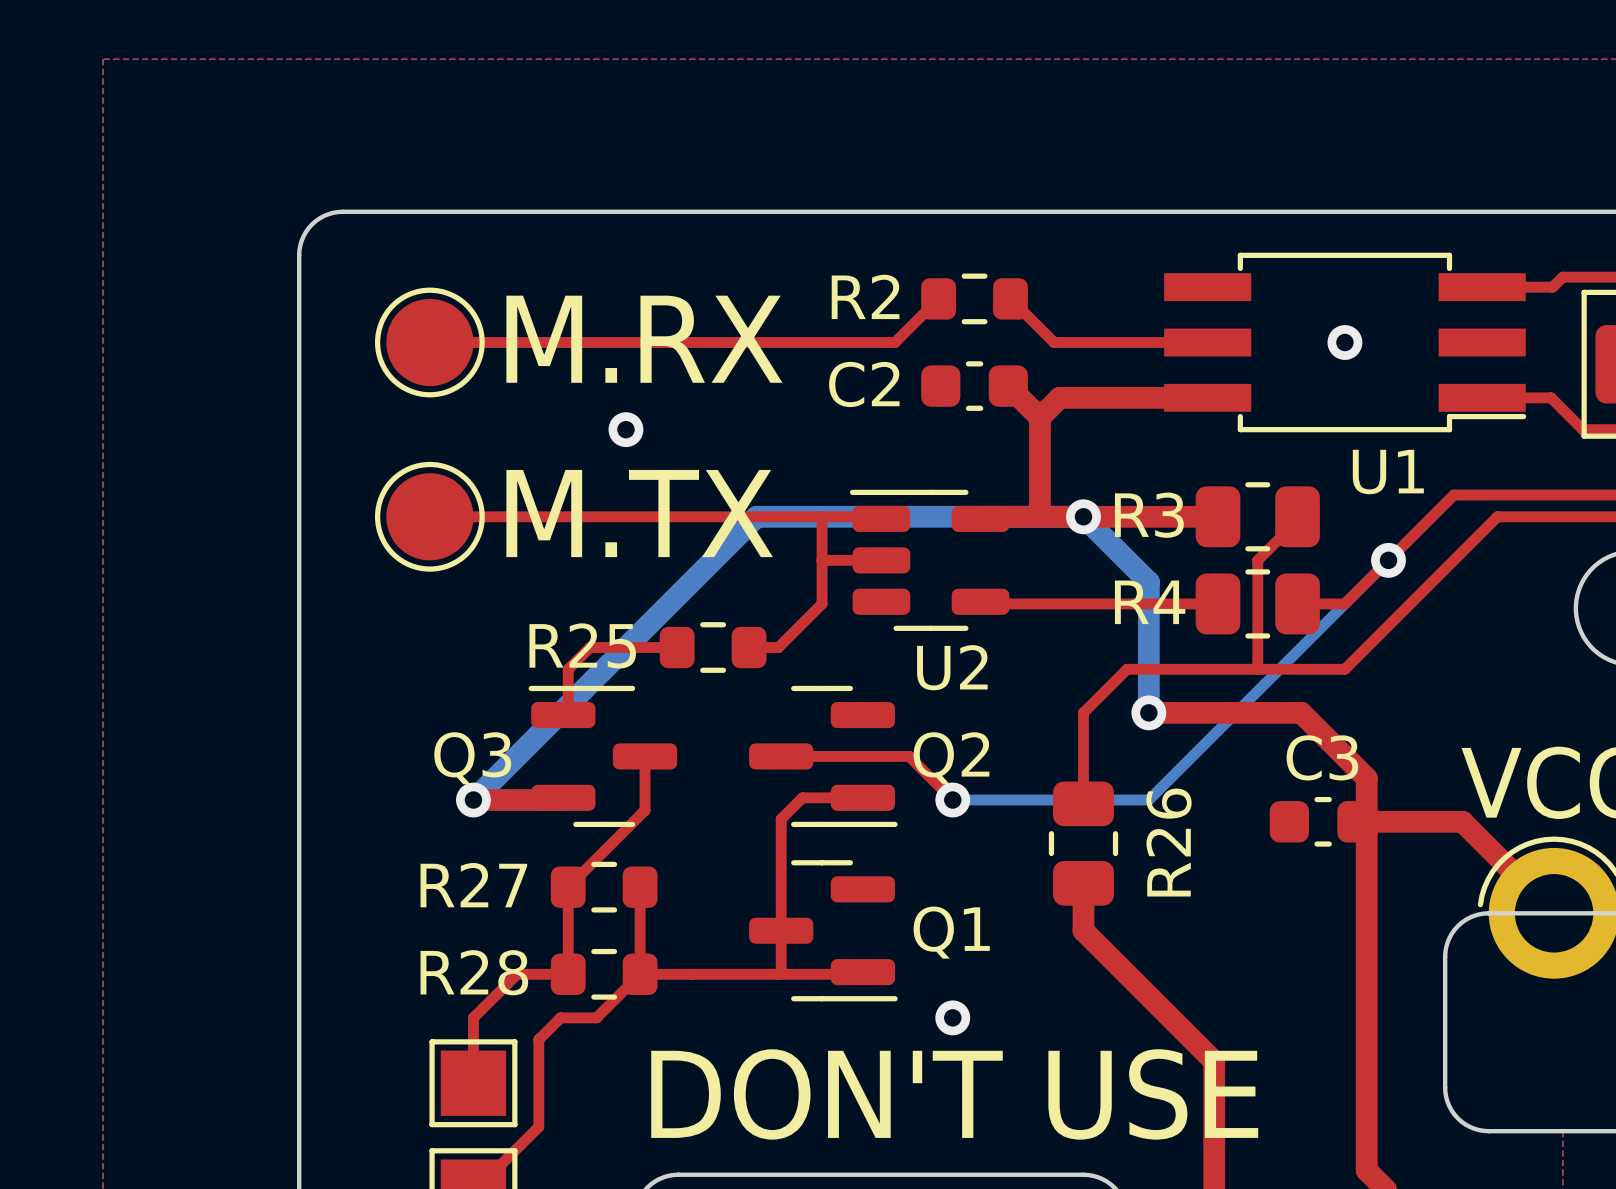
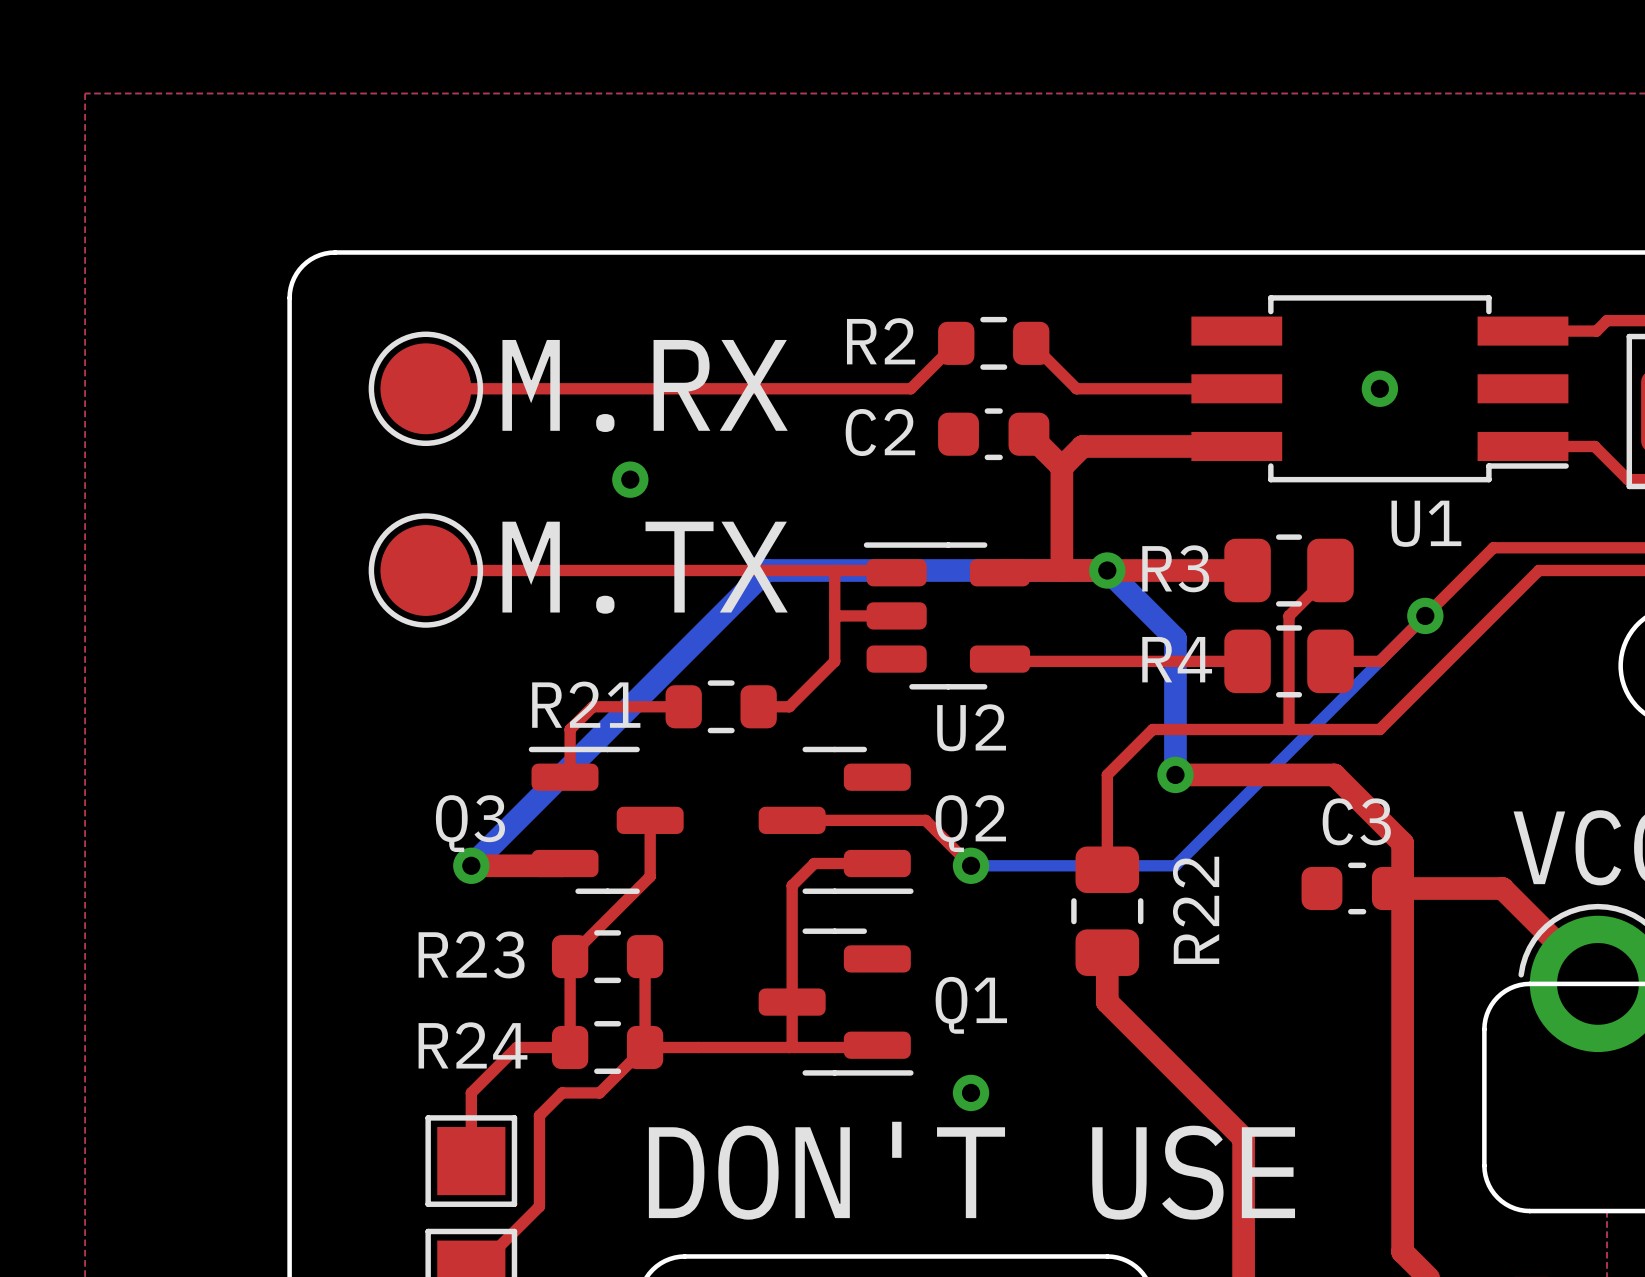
R25 name: R25 (582, 645) -> R21 (586, 704)
R26 name: R26 (1169, 842) -> R22 (1196, 910)
R27 name: R27 (473, 885) -> R23 (471, 954)
R28 name: R28 (474, 972) -> R24 (473, 1045)

